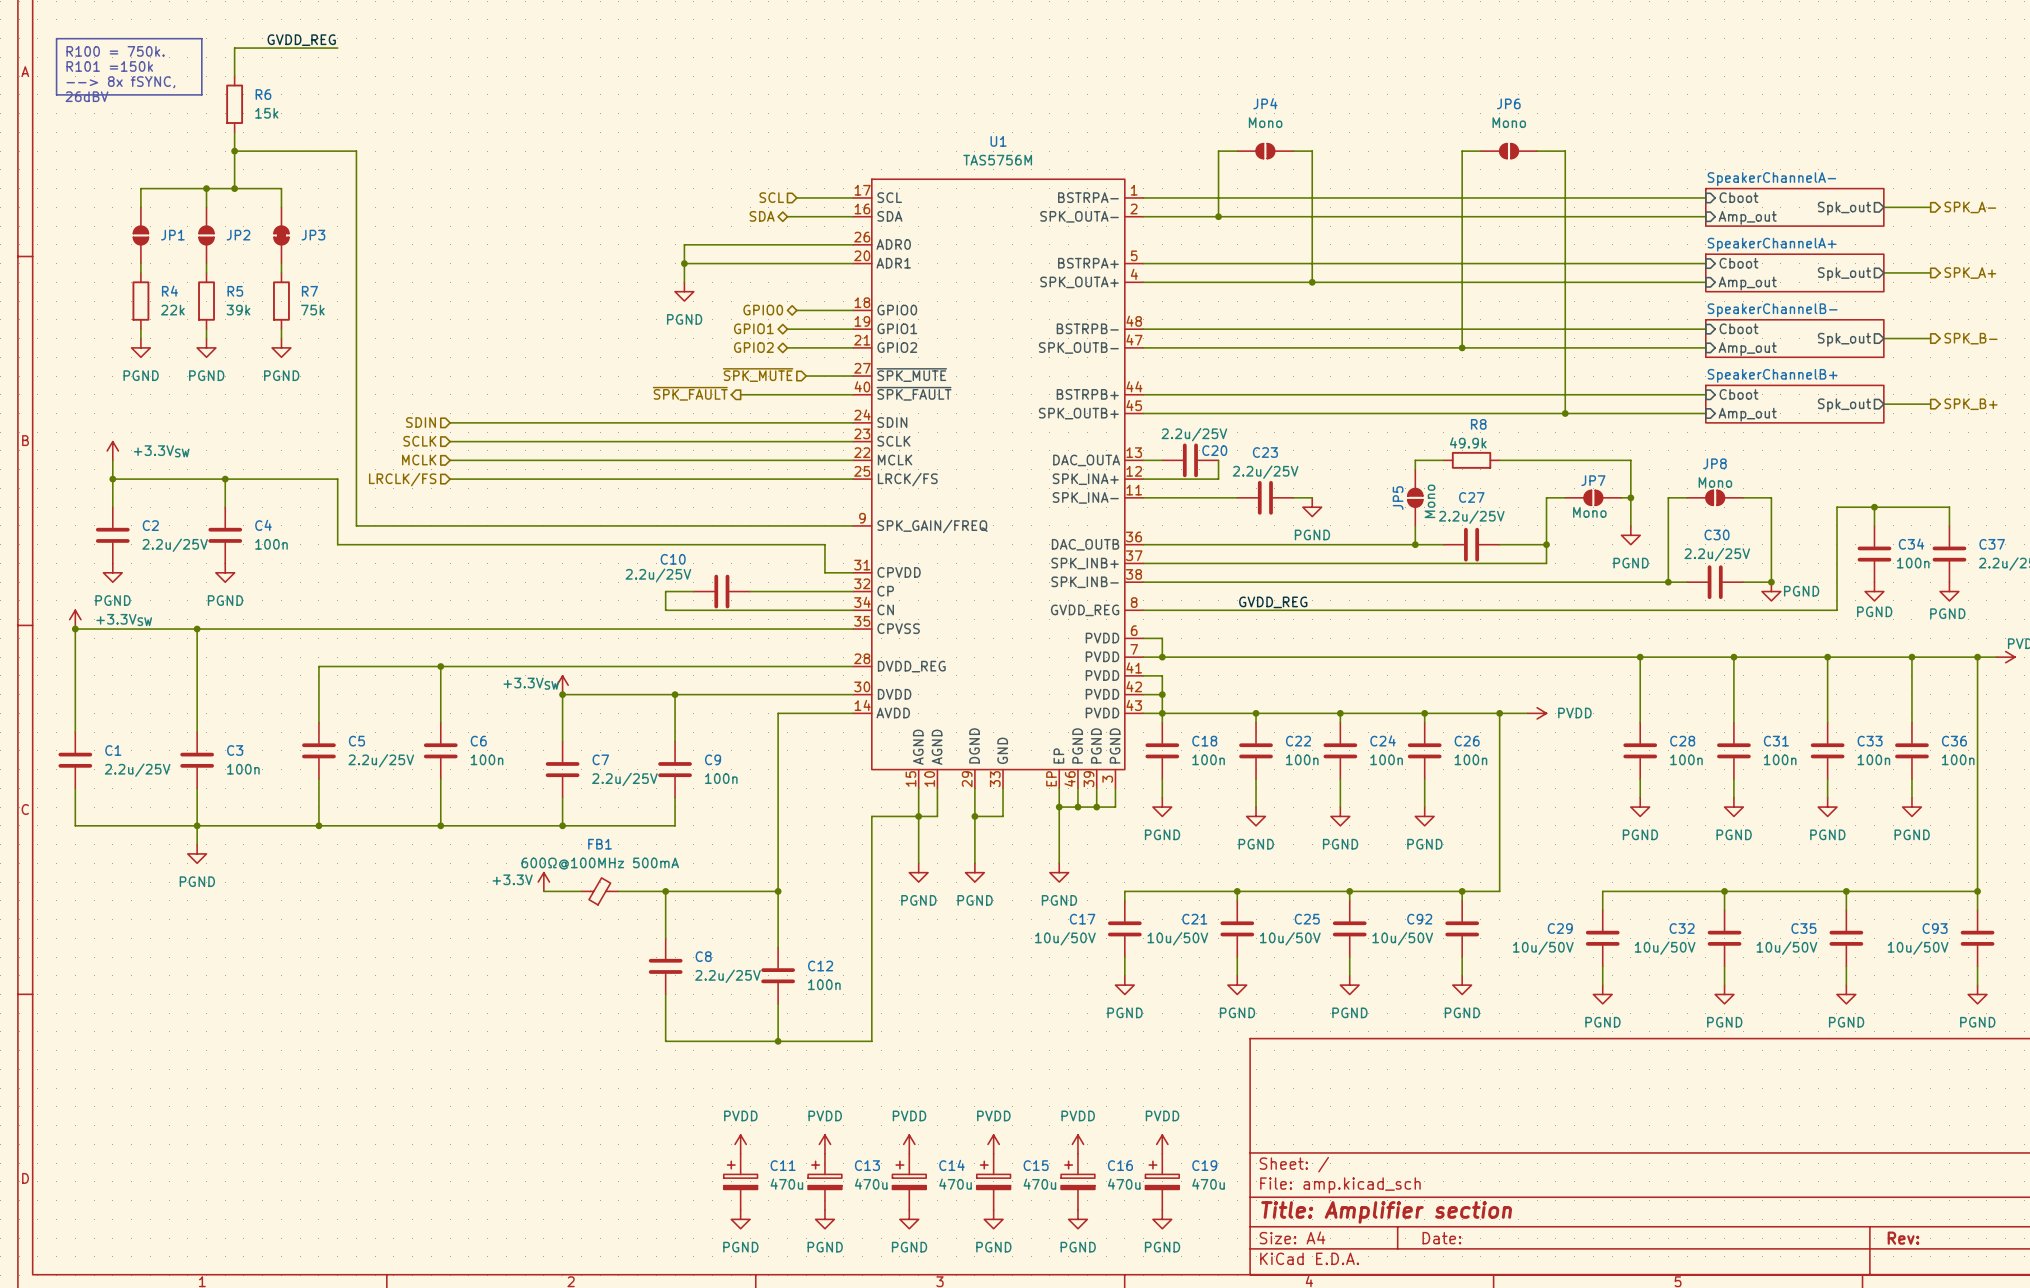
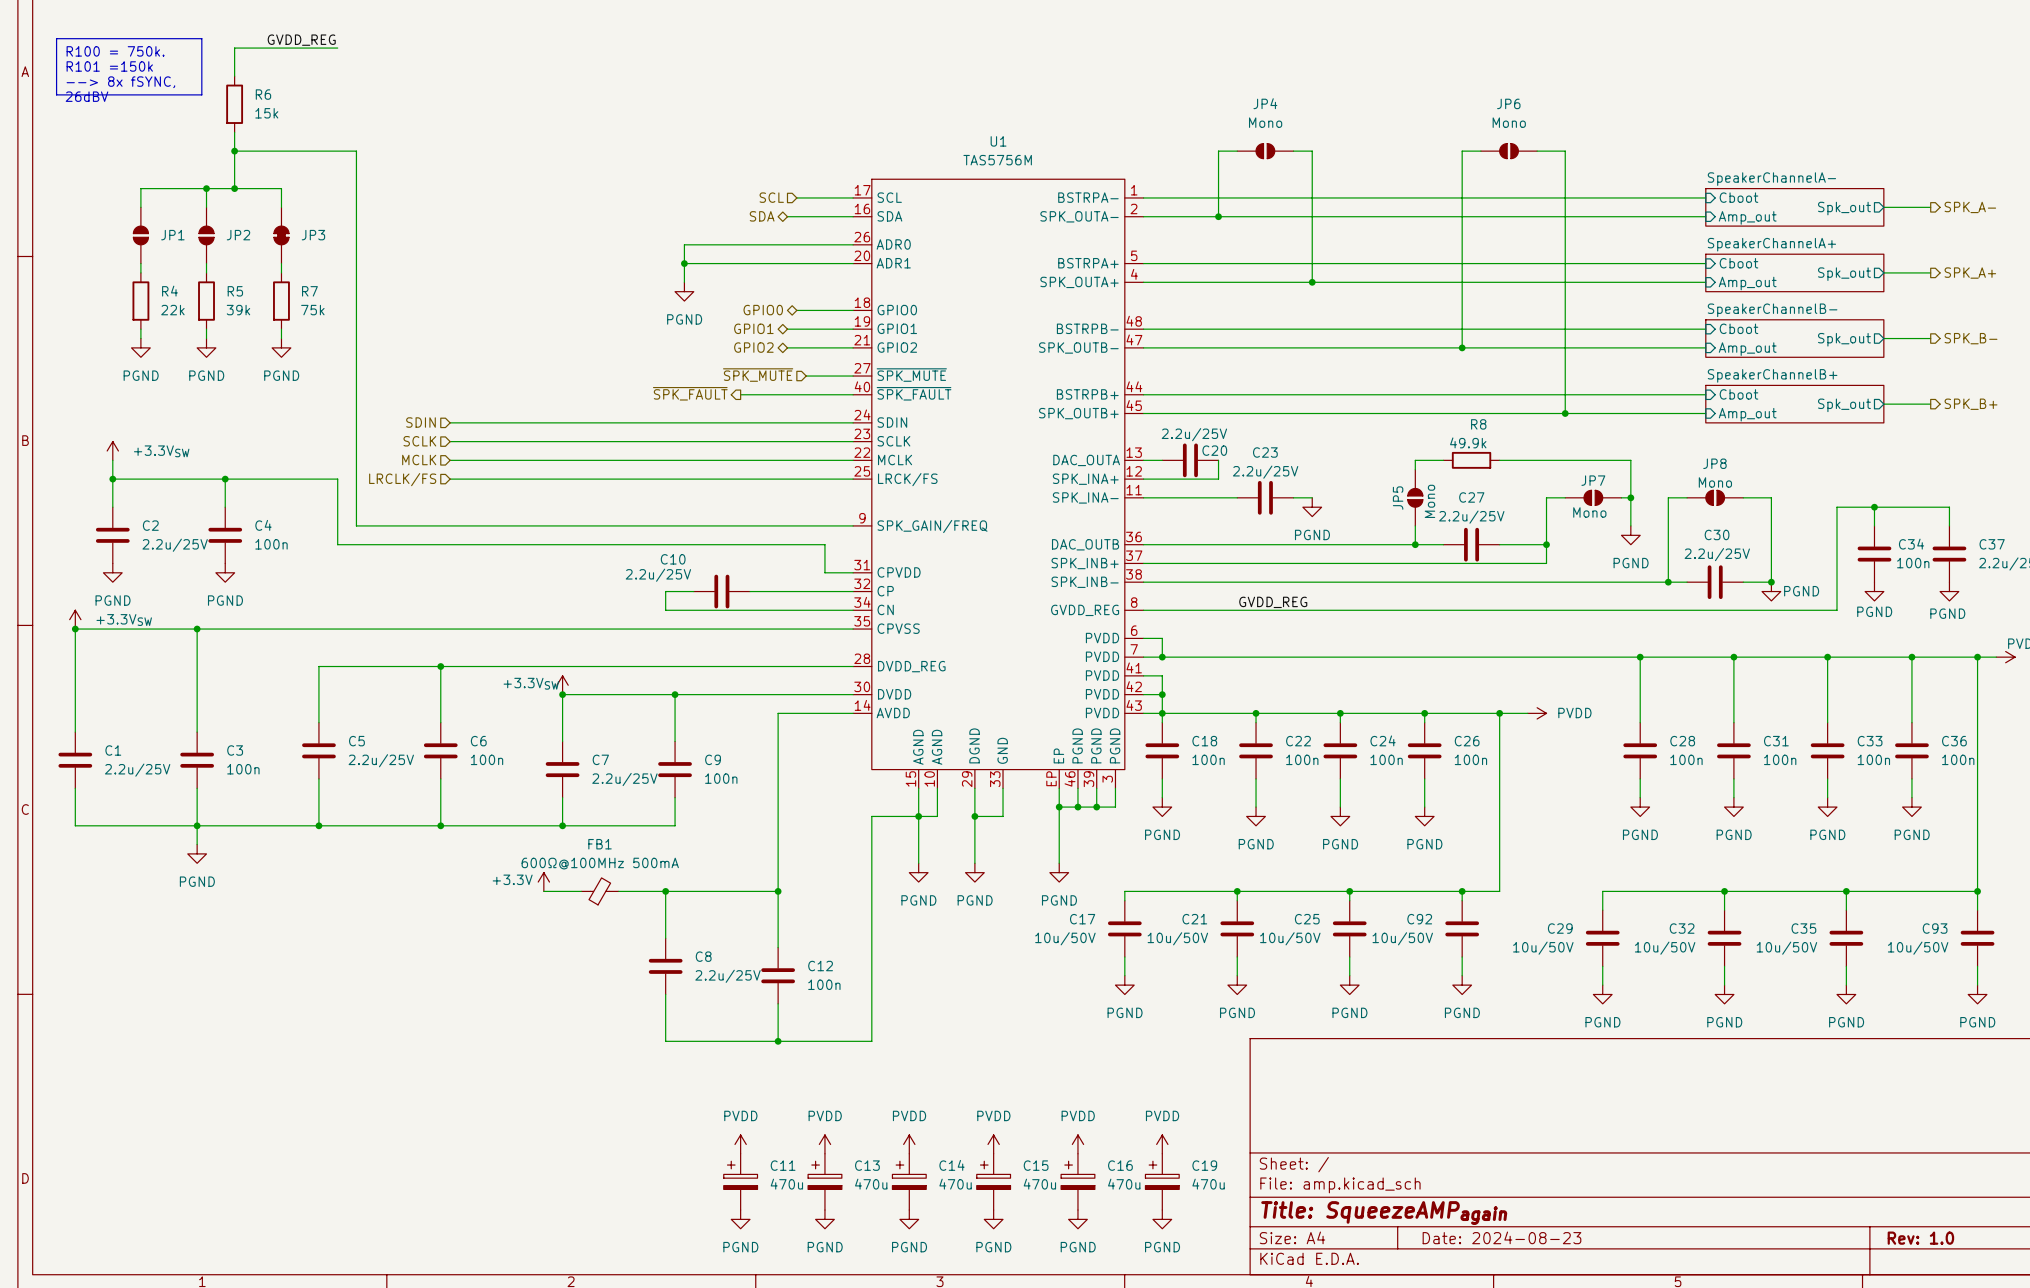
title block: Title: Amplifier section (1386, 1212) -> Title: SqueezeAMPagain (1384, 1213)
title block: Date: (1441, 1238) -> Date: 2024-08-23 (1501, 1237)
title block: Rev: (1903, 1238) -> Rev: 1.0 (1920, 1238)

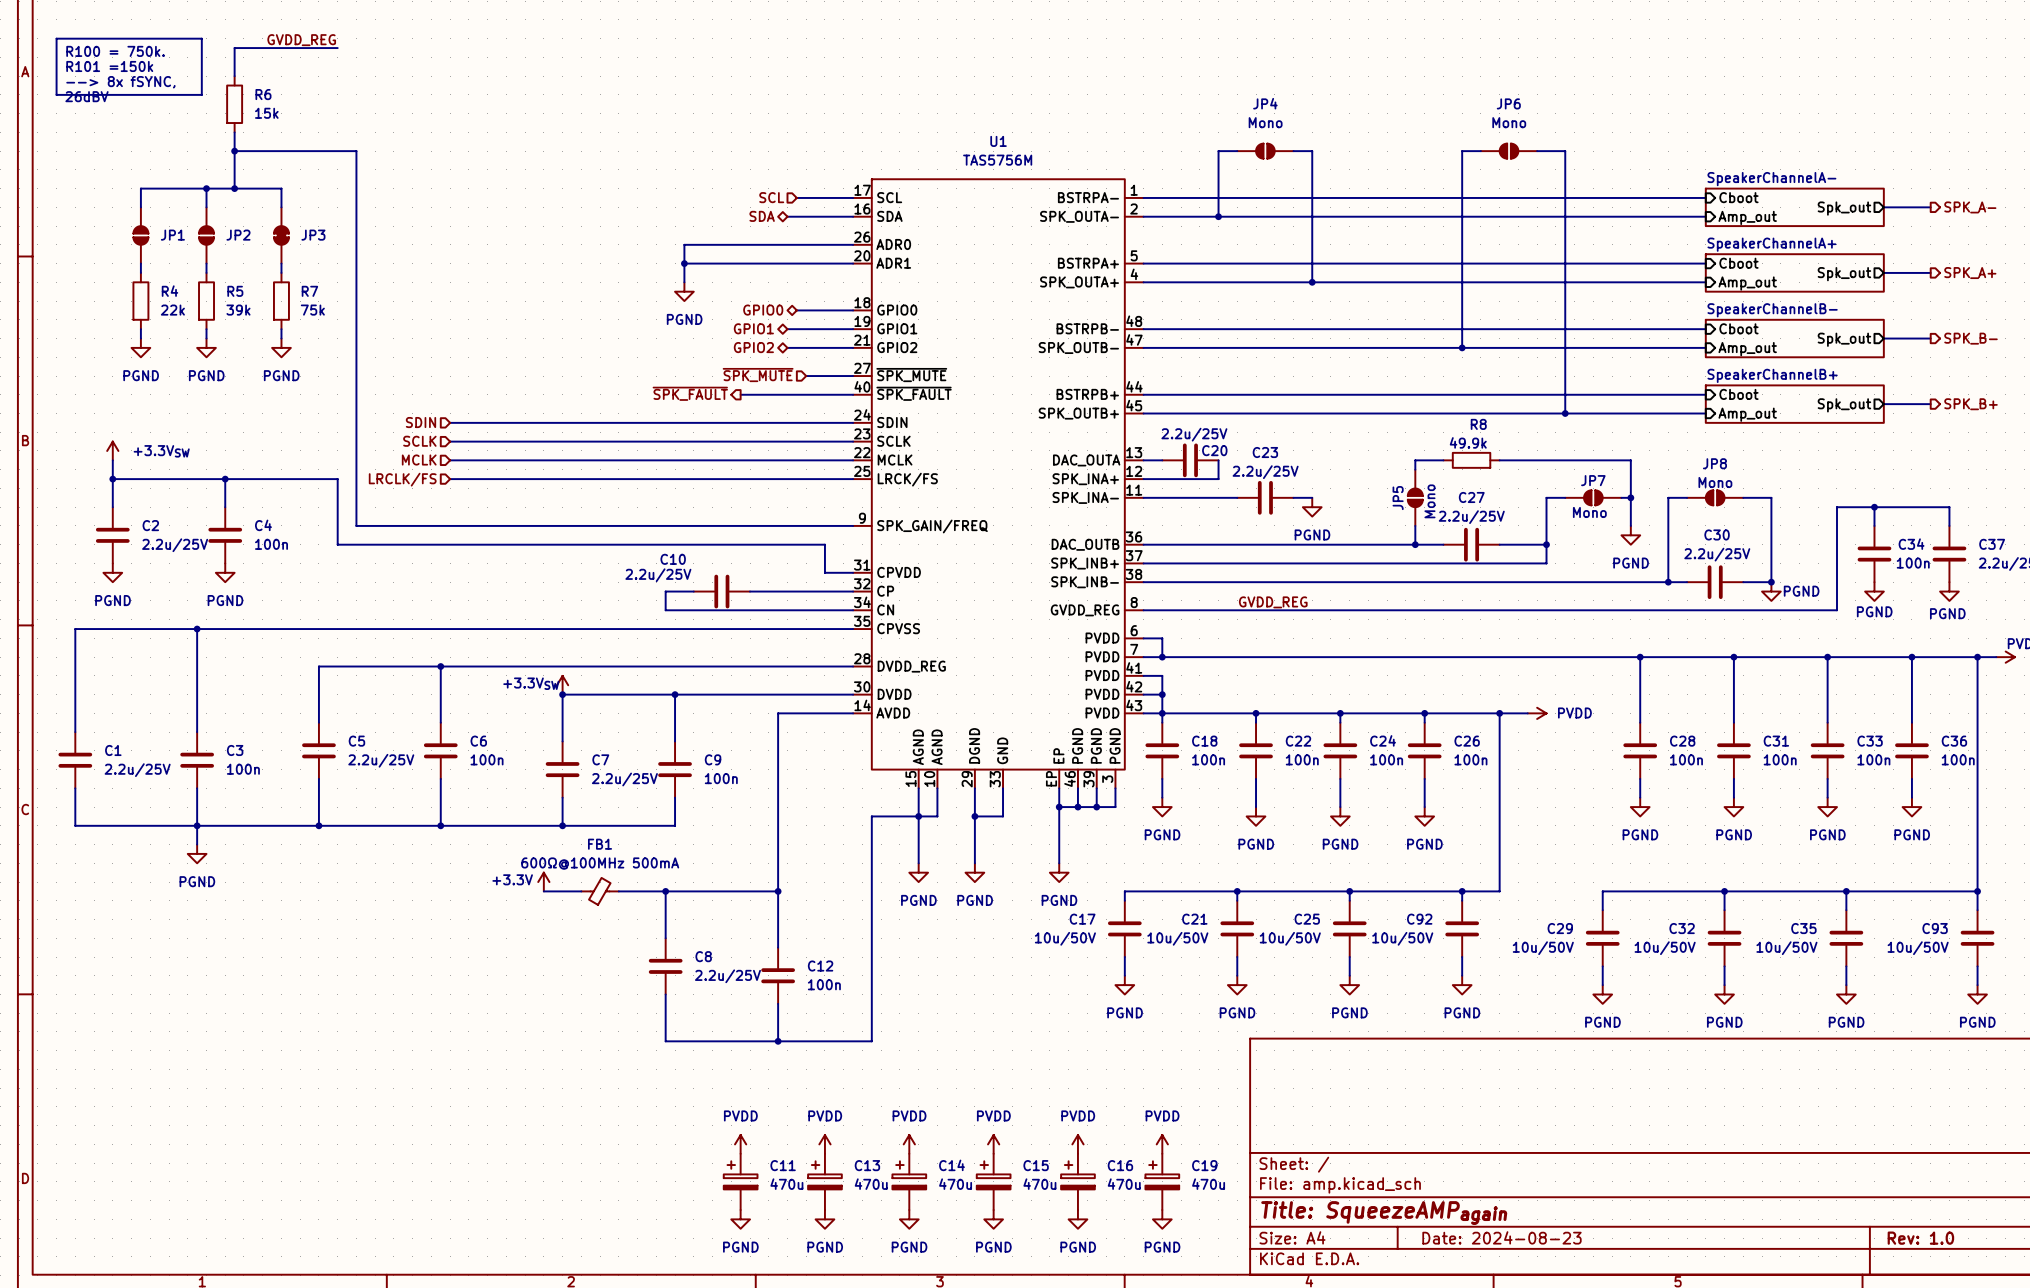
power symbol: +3.3VSW (75, 619) -> none
junction: (75, 629) -> none

